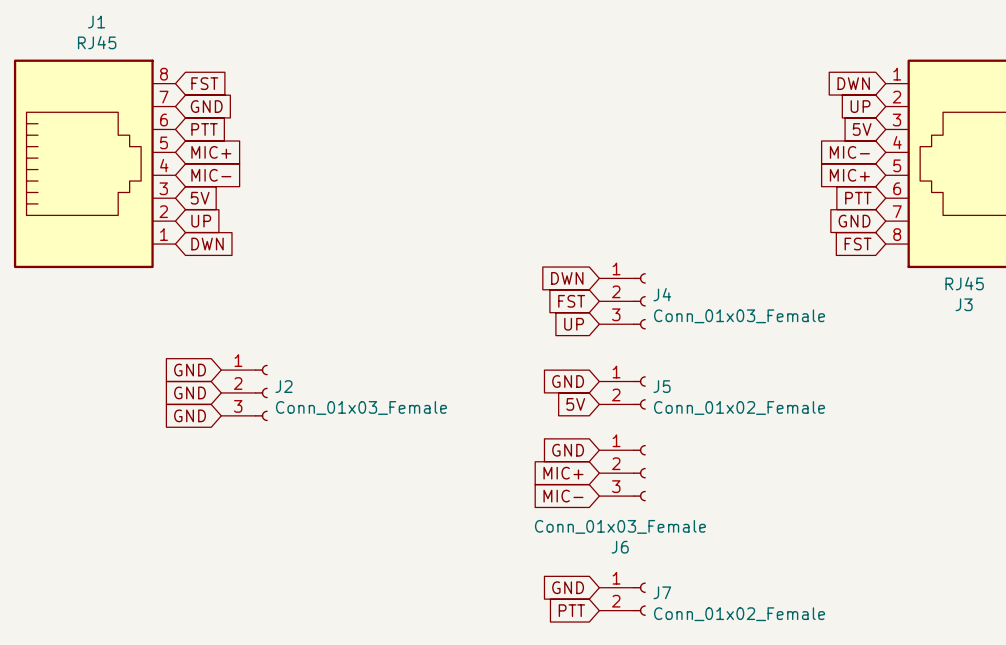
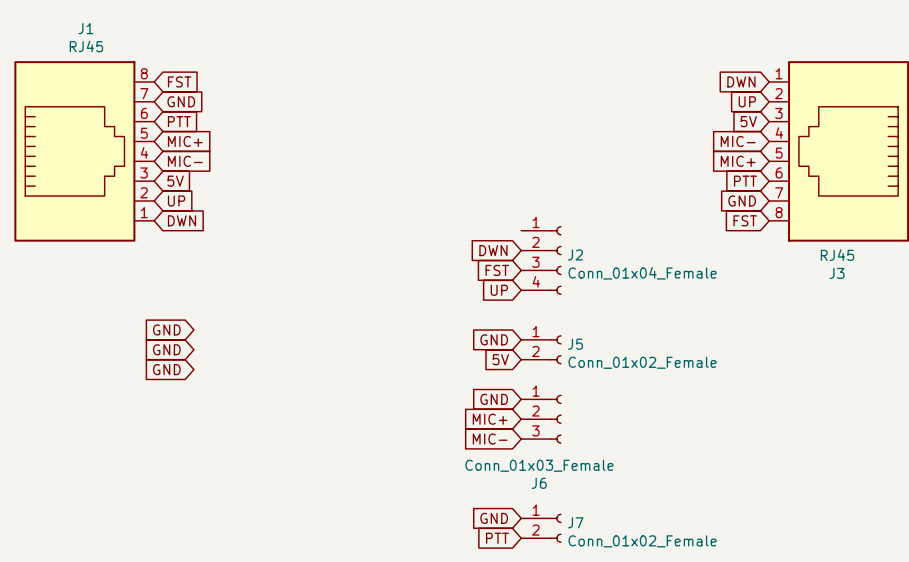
J4: Conn_01x03_Female (622, 301) -> none
J2 symbol: [221, 364, 268, 422] -> [521, 226, 562, 295]
J2 value: Conn_01x03_Female (361, 407) -> Conn_01x04_Female (642, 273)

